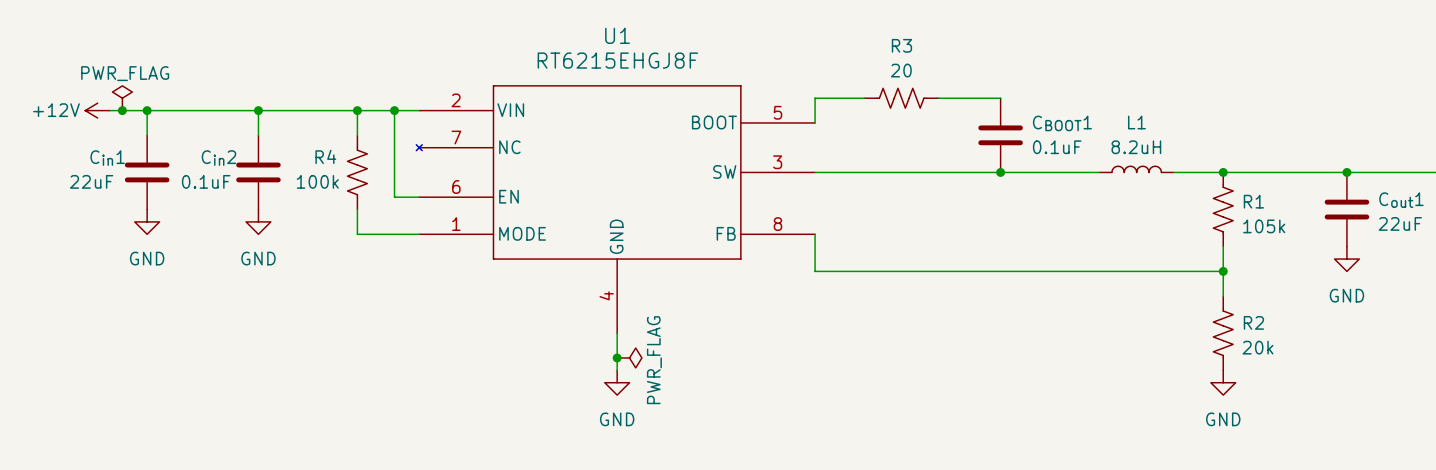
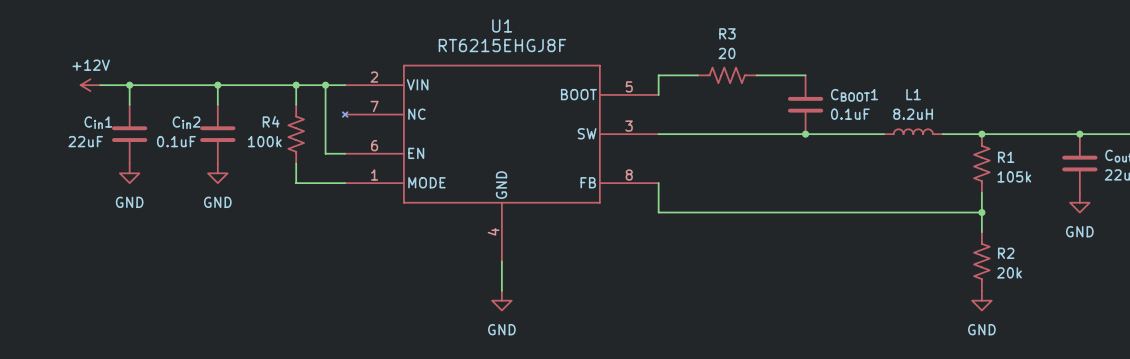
power symbol: PWR_FLAG (122, 98) -> none
power symbol text position: +12V (56, 110) -> +12V (91, 65)
junction: (122, 110) -> none
junction: (617, 357) -> none
power symbol: PWR_FLAG (629, 357) -> none

